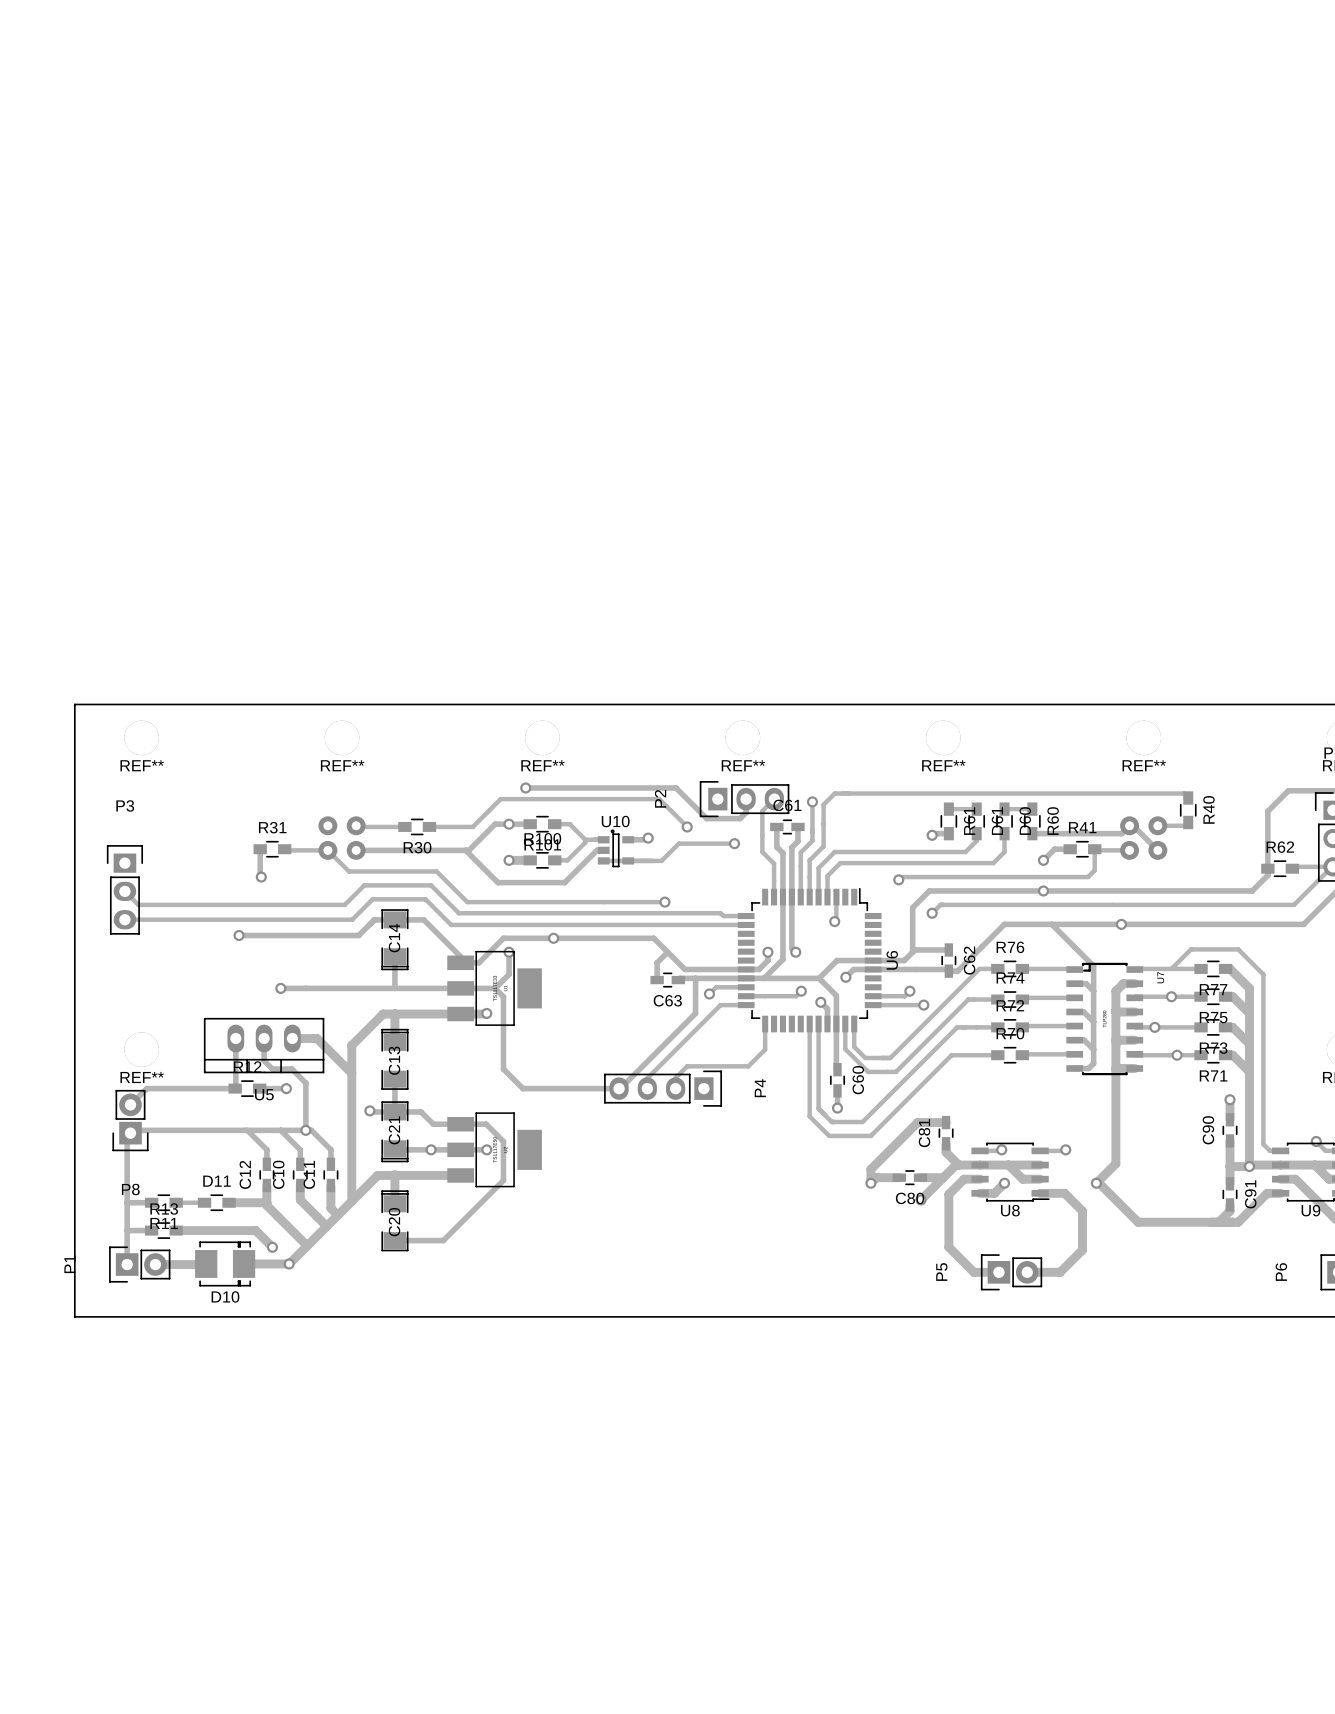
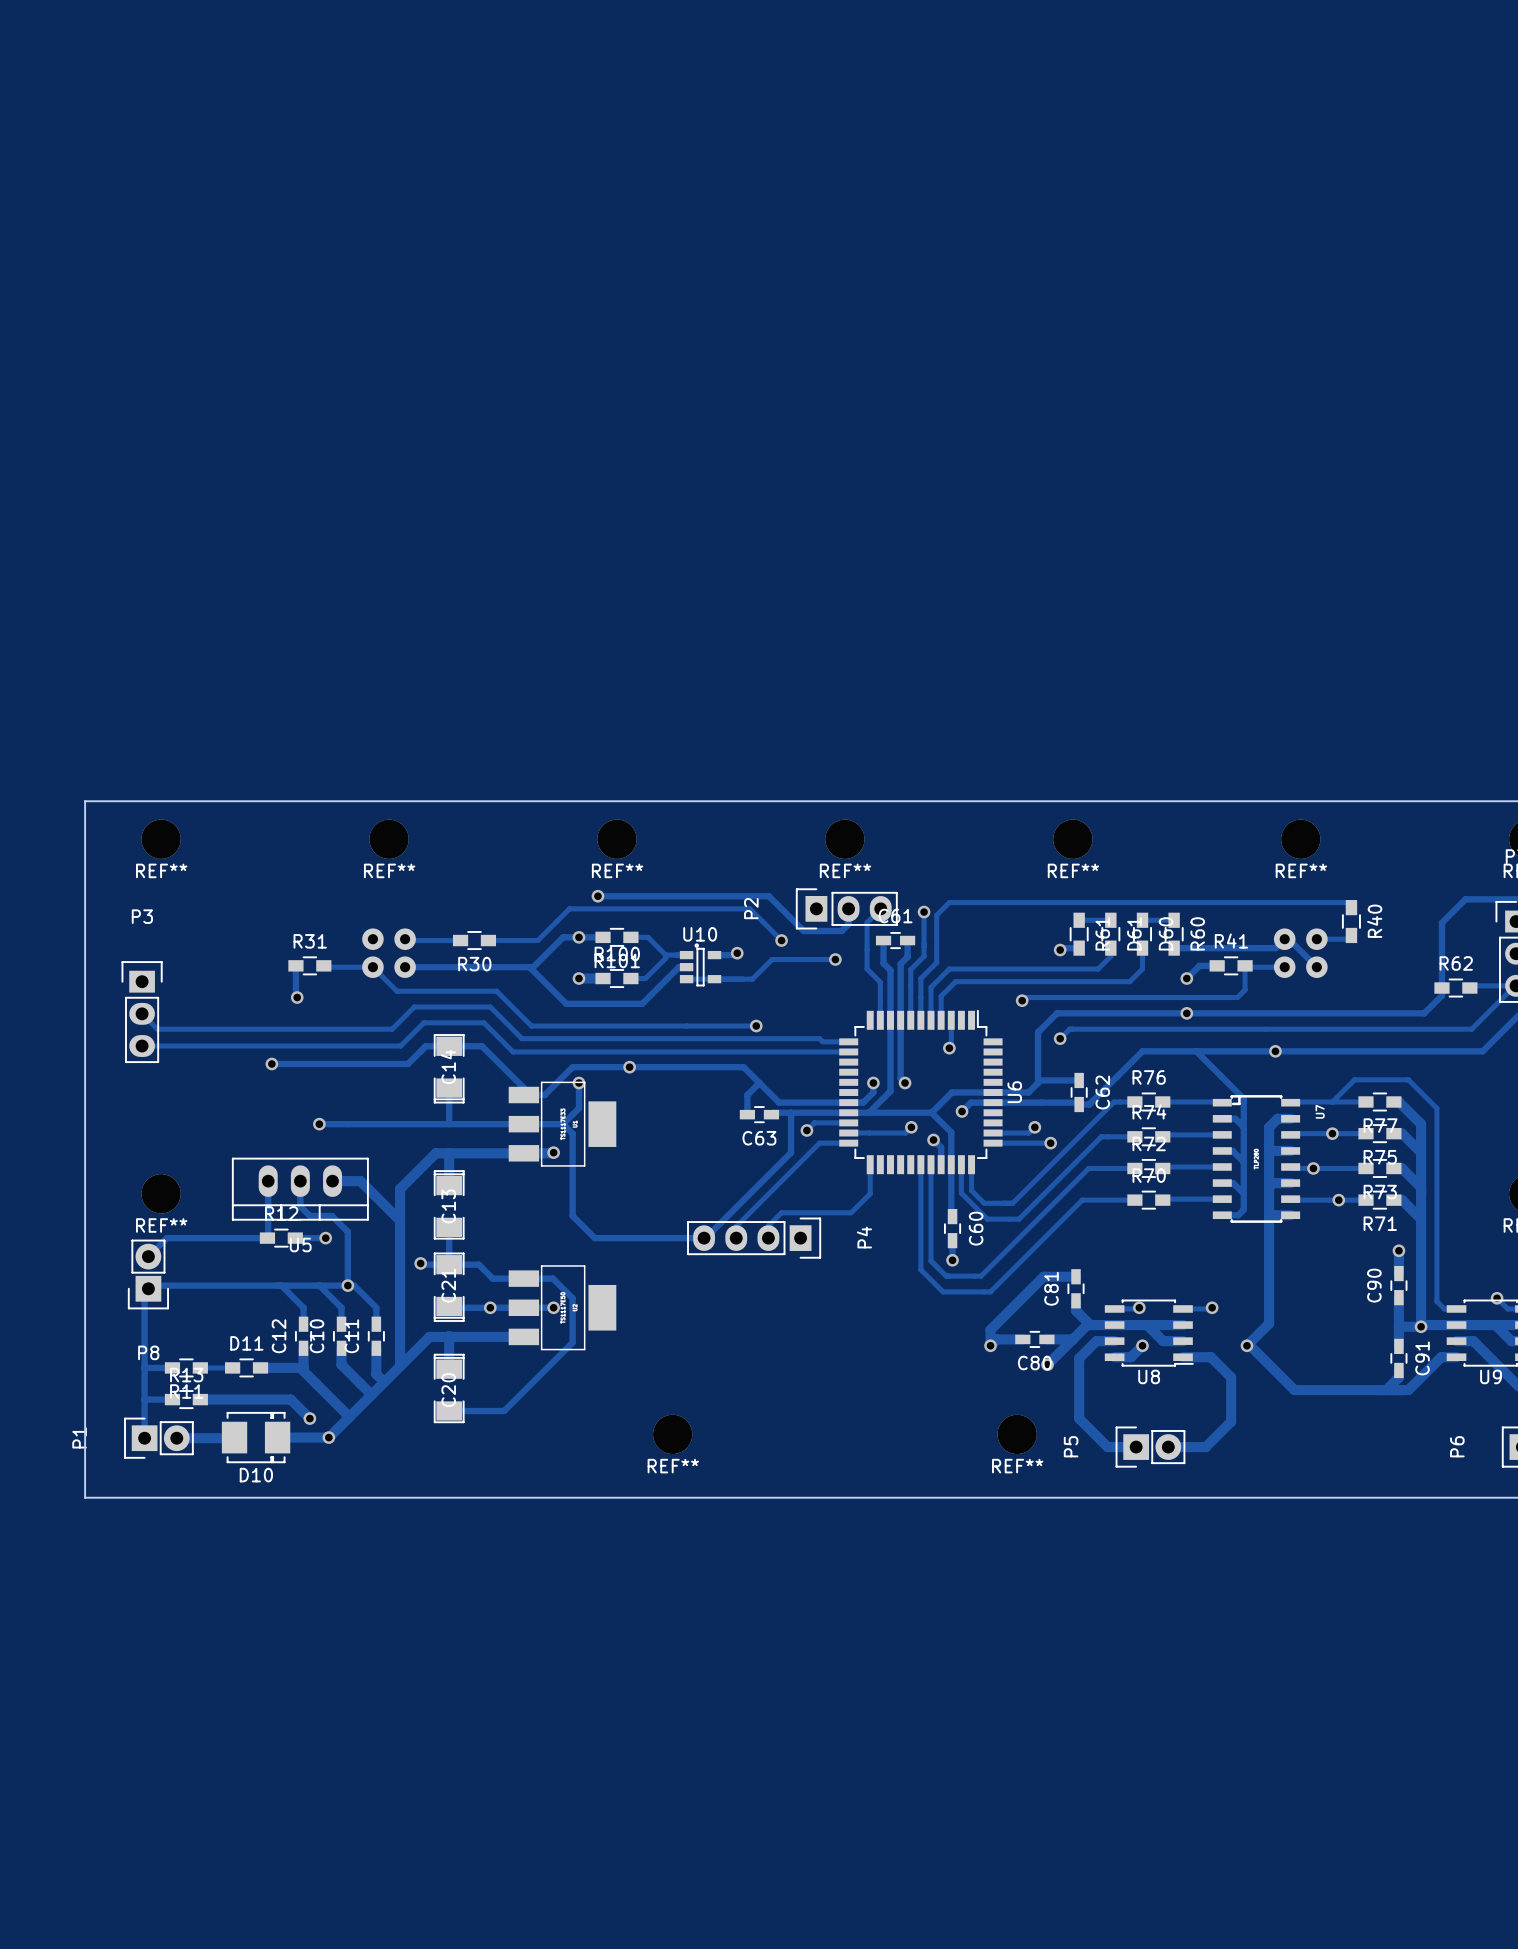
REF**: none -> (672, 1434)
REF**: none -> (1017, 1434)

